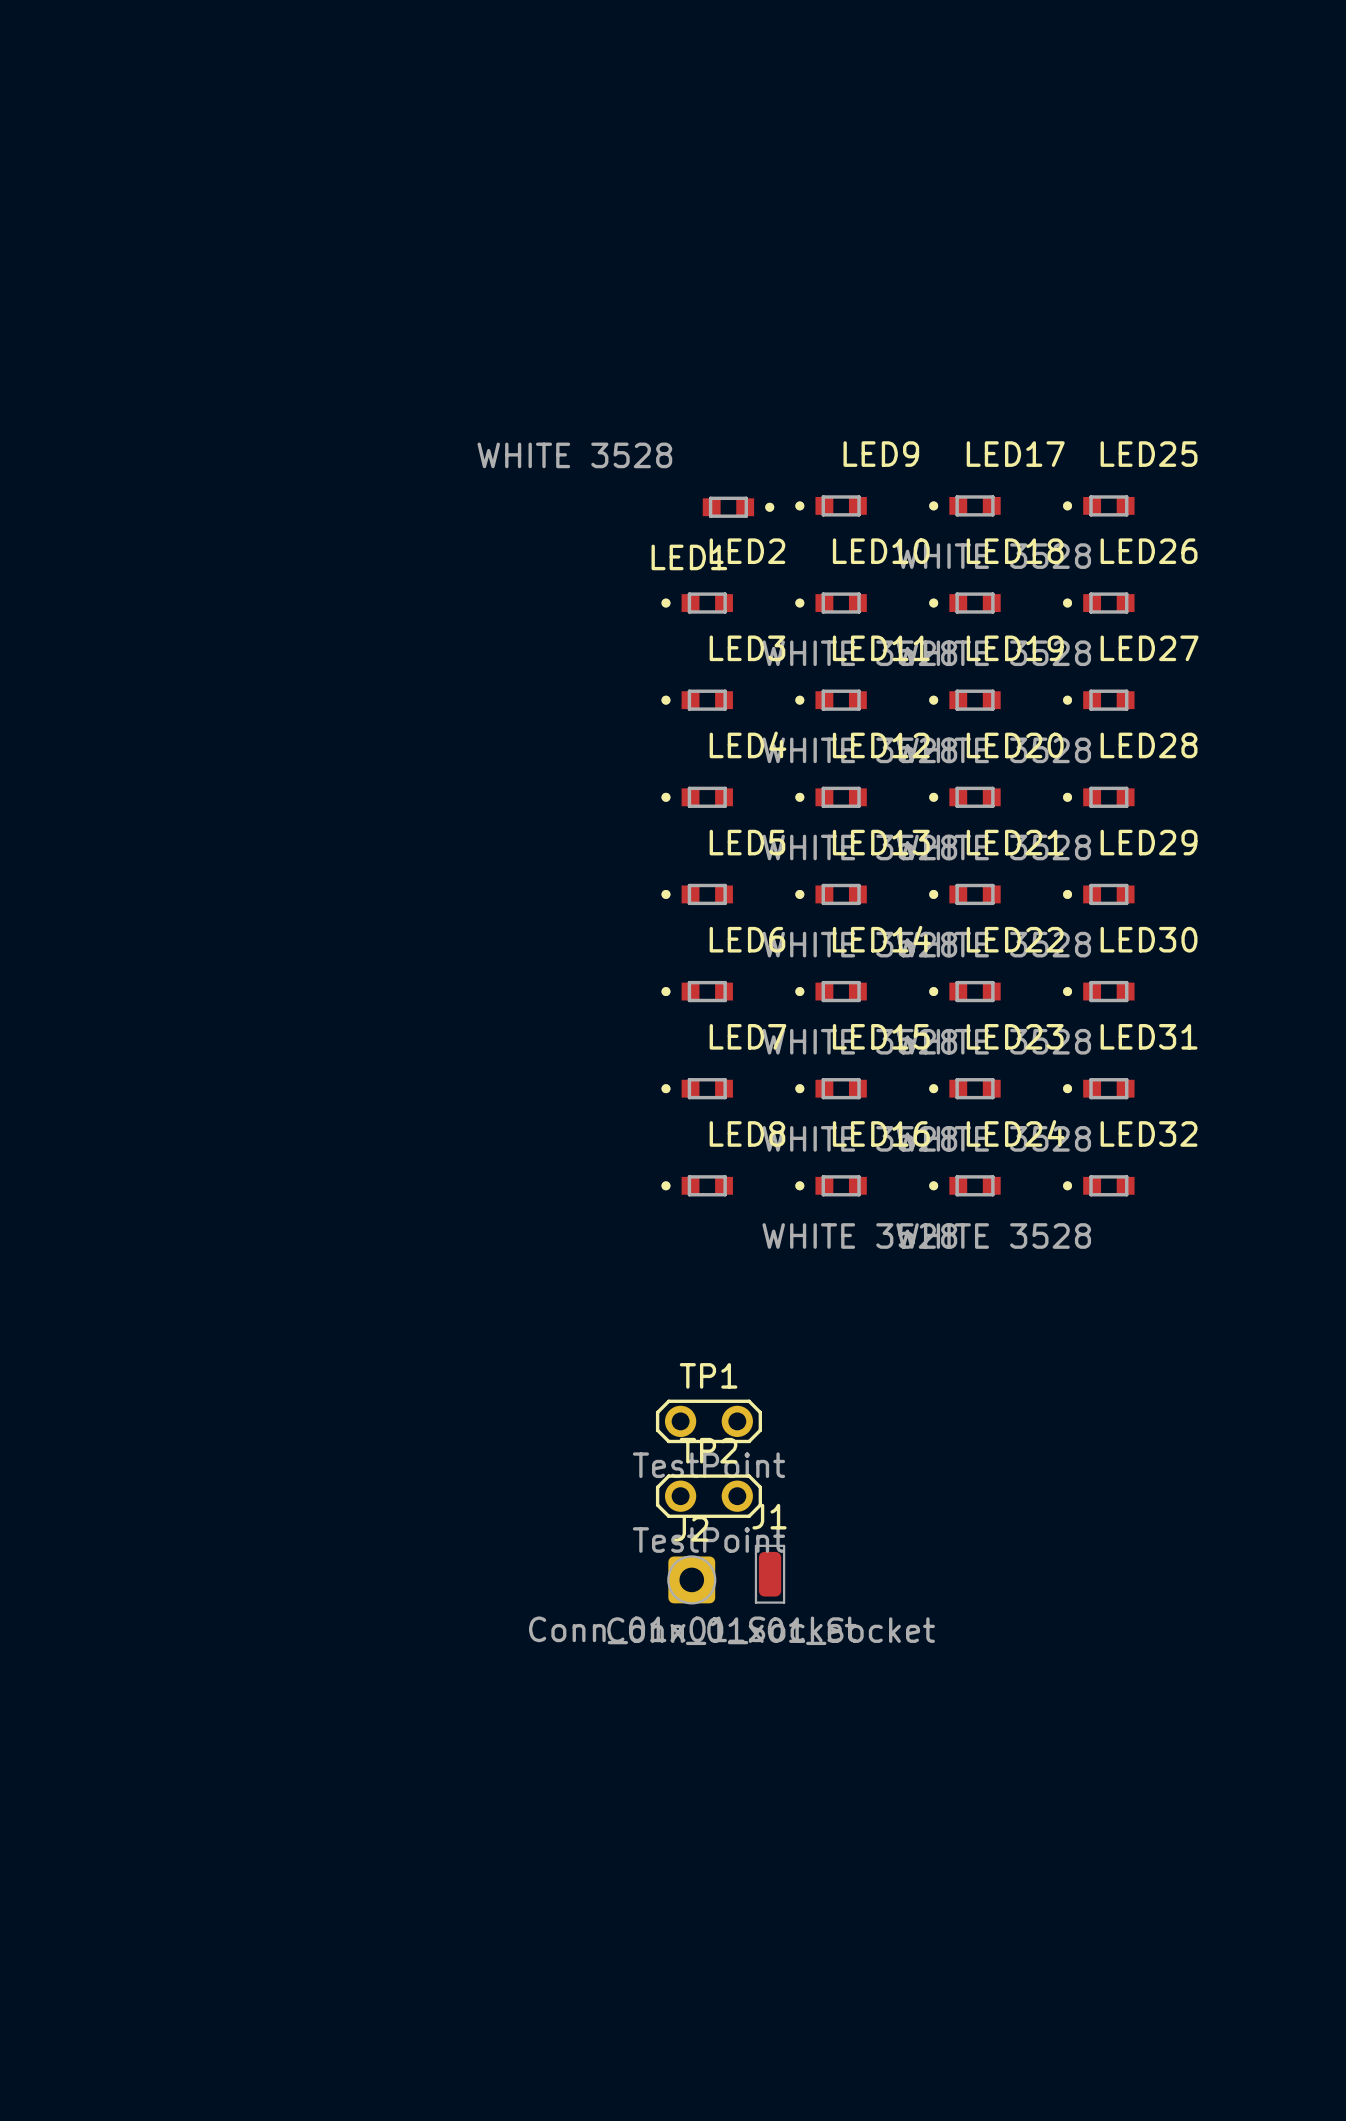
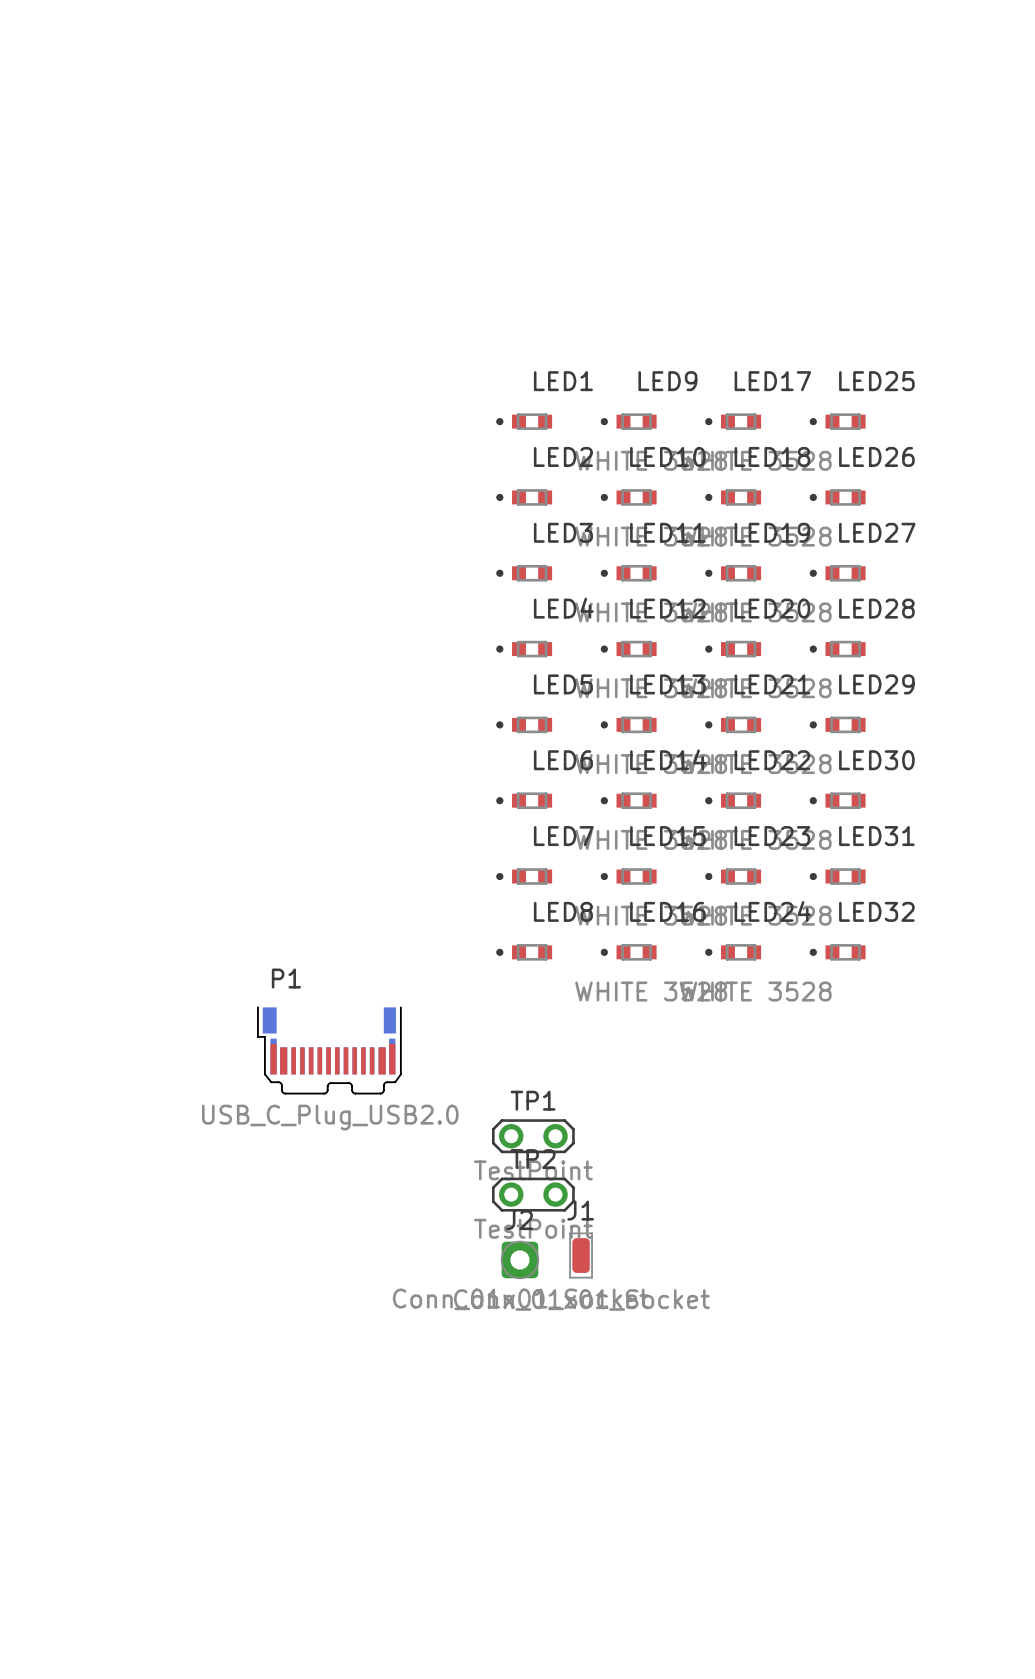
LED1 rotation: 0° (738, 507) -> 180° (524, 421)
P1: none -> USB_C_Plug_USB2.0 (329, 1050)

